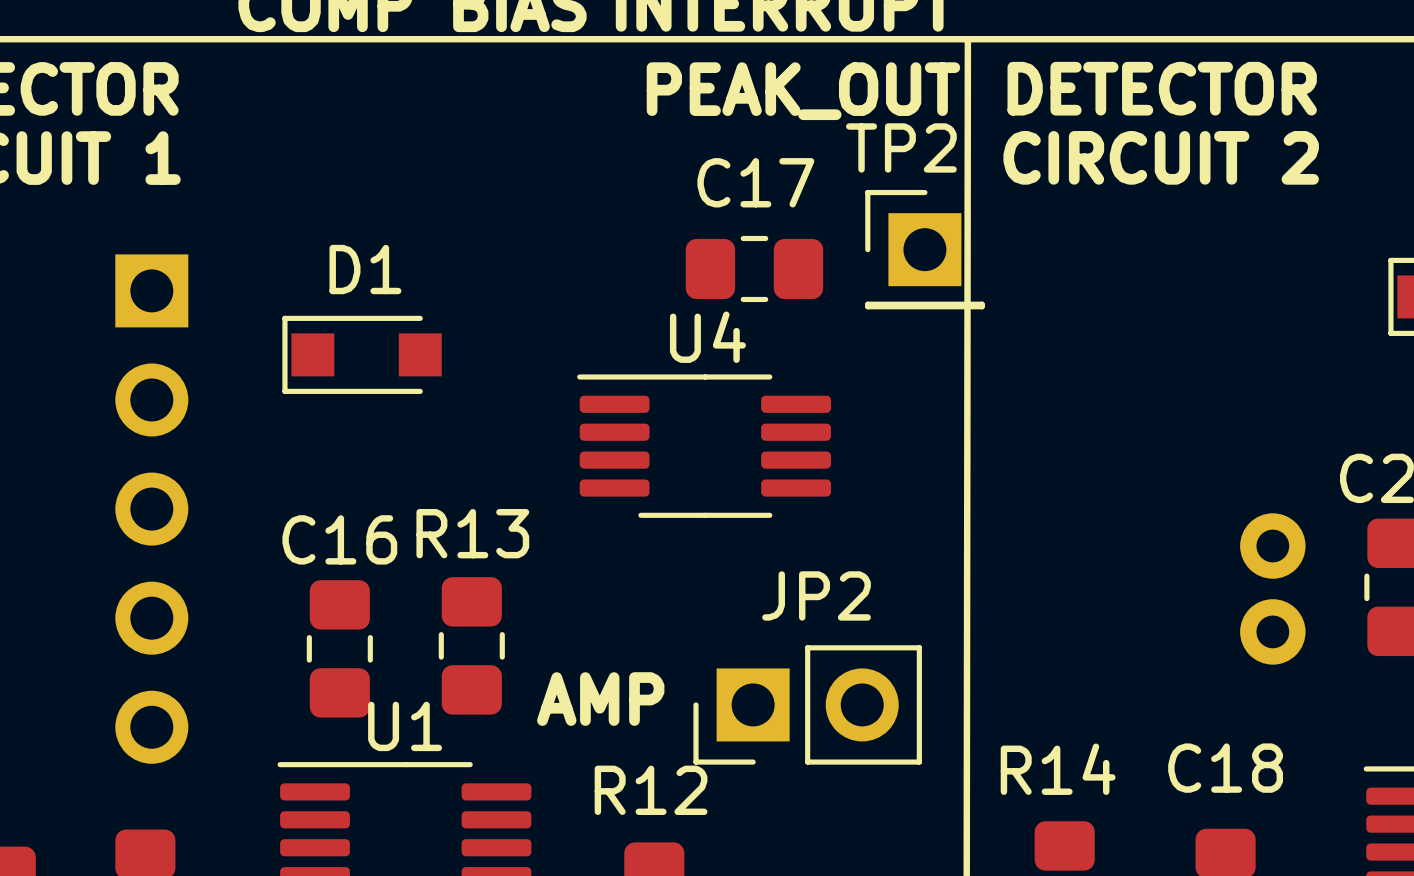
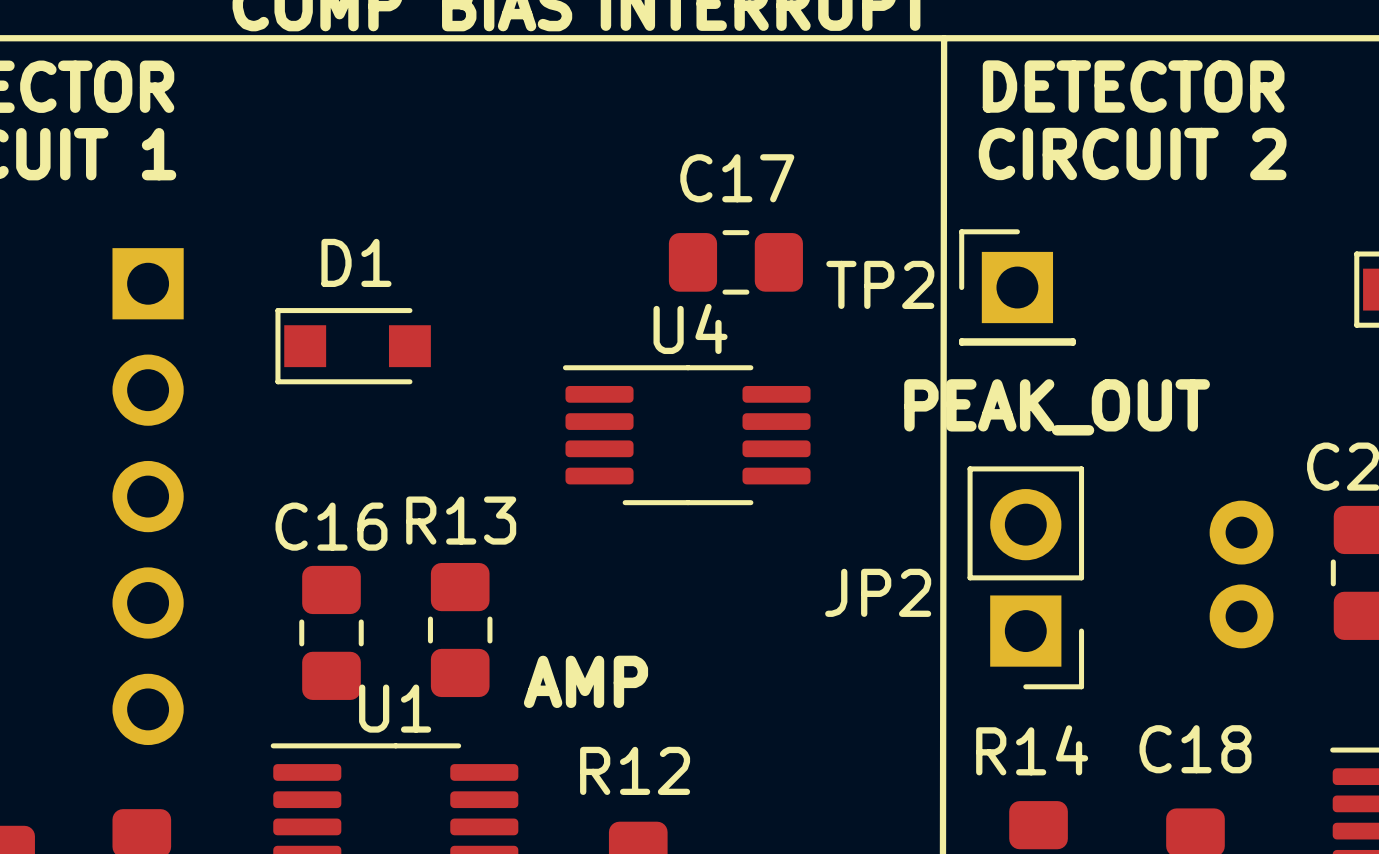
text position: PEAK_OUT (803, 91) -> PEAK_OUT (1057, 407)
TP2 name position: TP2 (901, 147) -> TP2 (880, 284)
TP2 position: (924, 249) -> (1017, 287)
JP2 rotation: 0° (807, 704) -> 90° counterclockwise (1025, 577)
JP2 position: (807, 704) -> (1025, 577)

